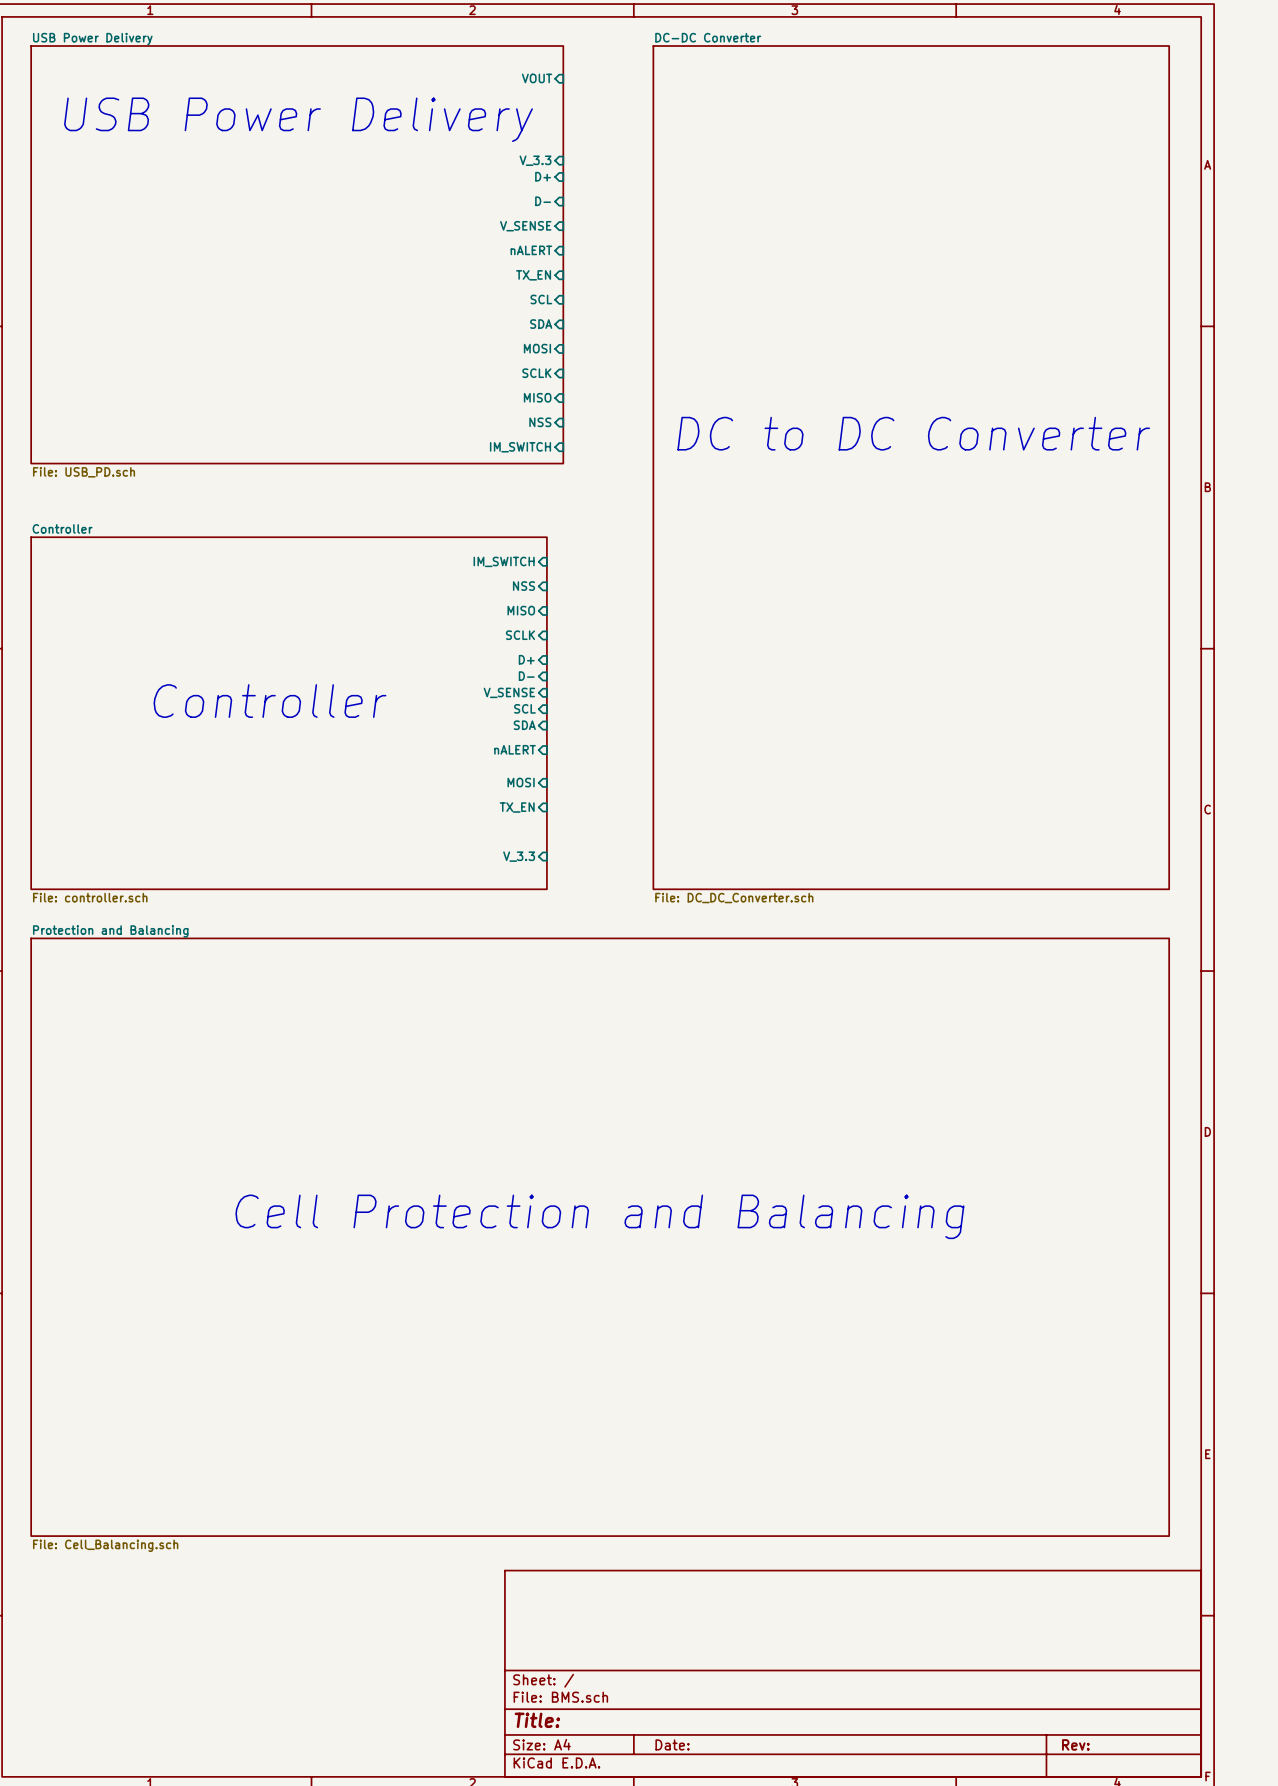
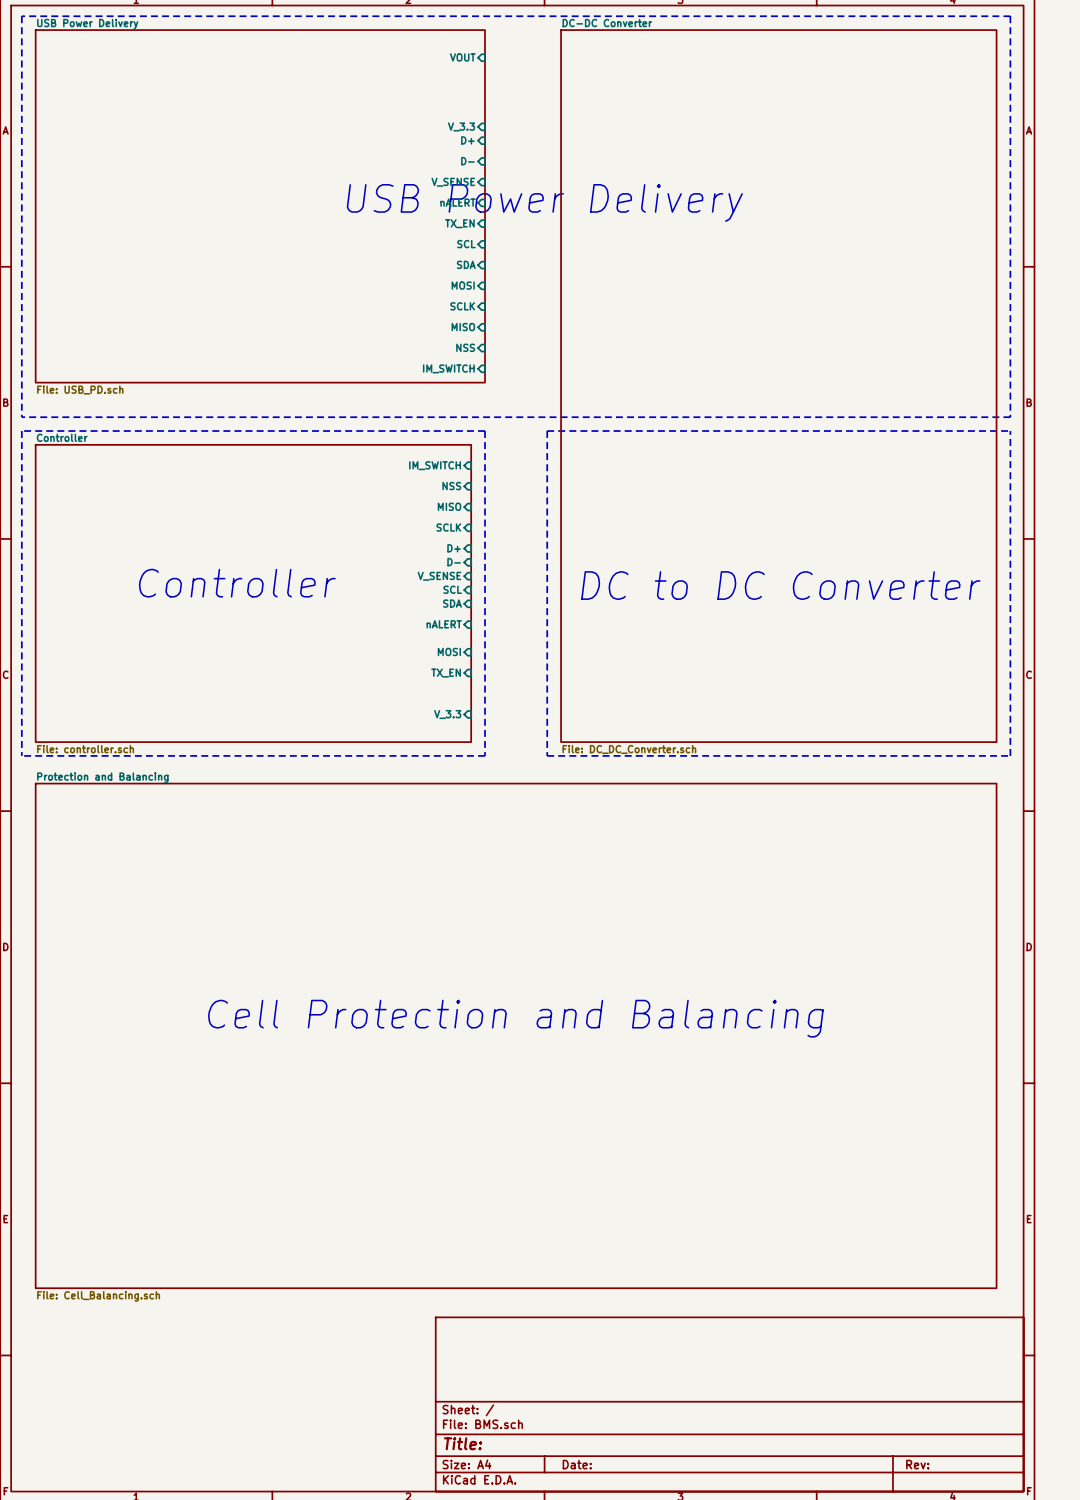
line: none -> (21, 16) (21, 417) (1010, 417) (1010, 16) (21, 16)
text: USB Power Delivery (298, 119) -> none
text: none -> USB Power Delivery (544, 202)
text: DC to DC Converter (913, 433) -> none
line: none -> (21, 431) (21, 755) (485, 755) (485, 431) (21, 431)
line: none -> (547, 431) (1010, 431) (1010, 755) (547, 755) (547, 431)
text: none -> DC to DC Converter (780, 585)

